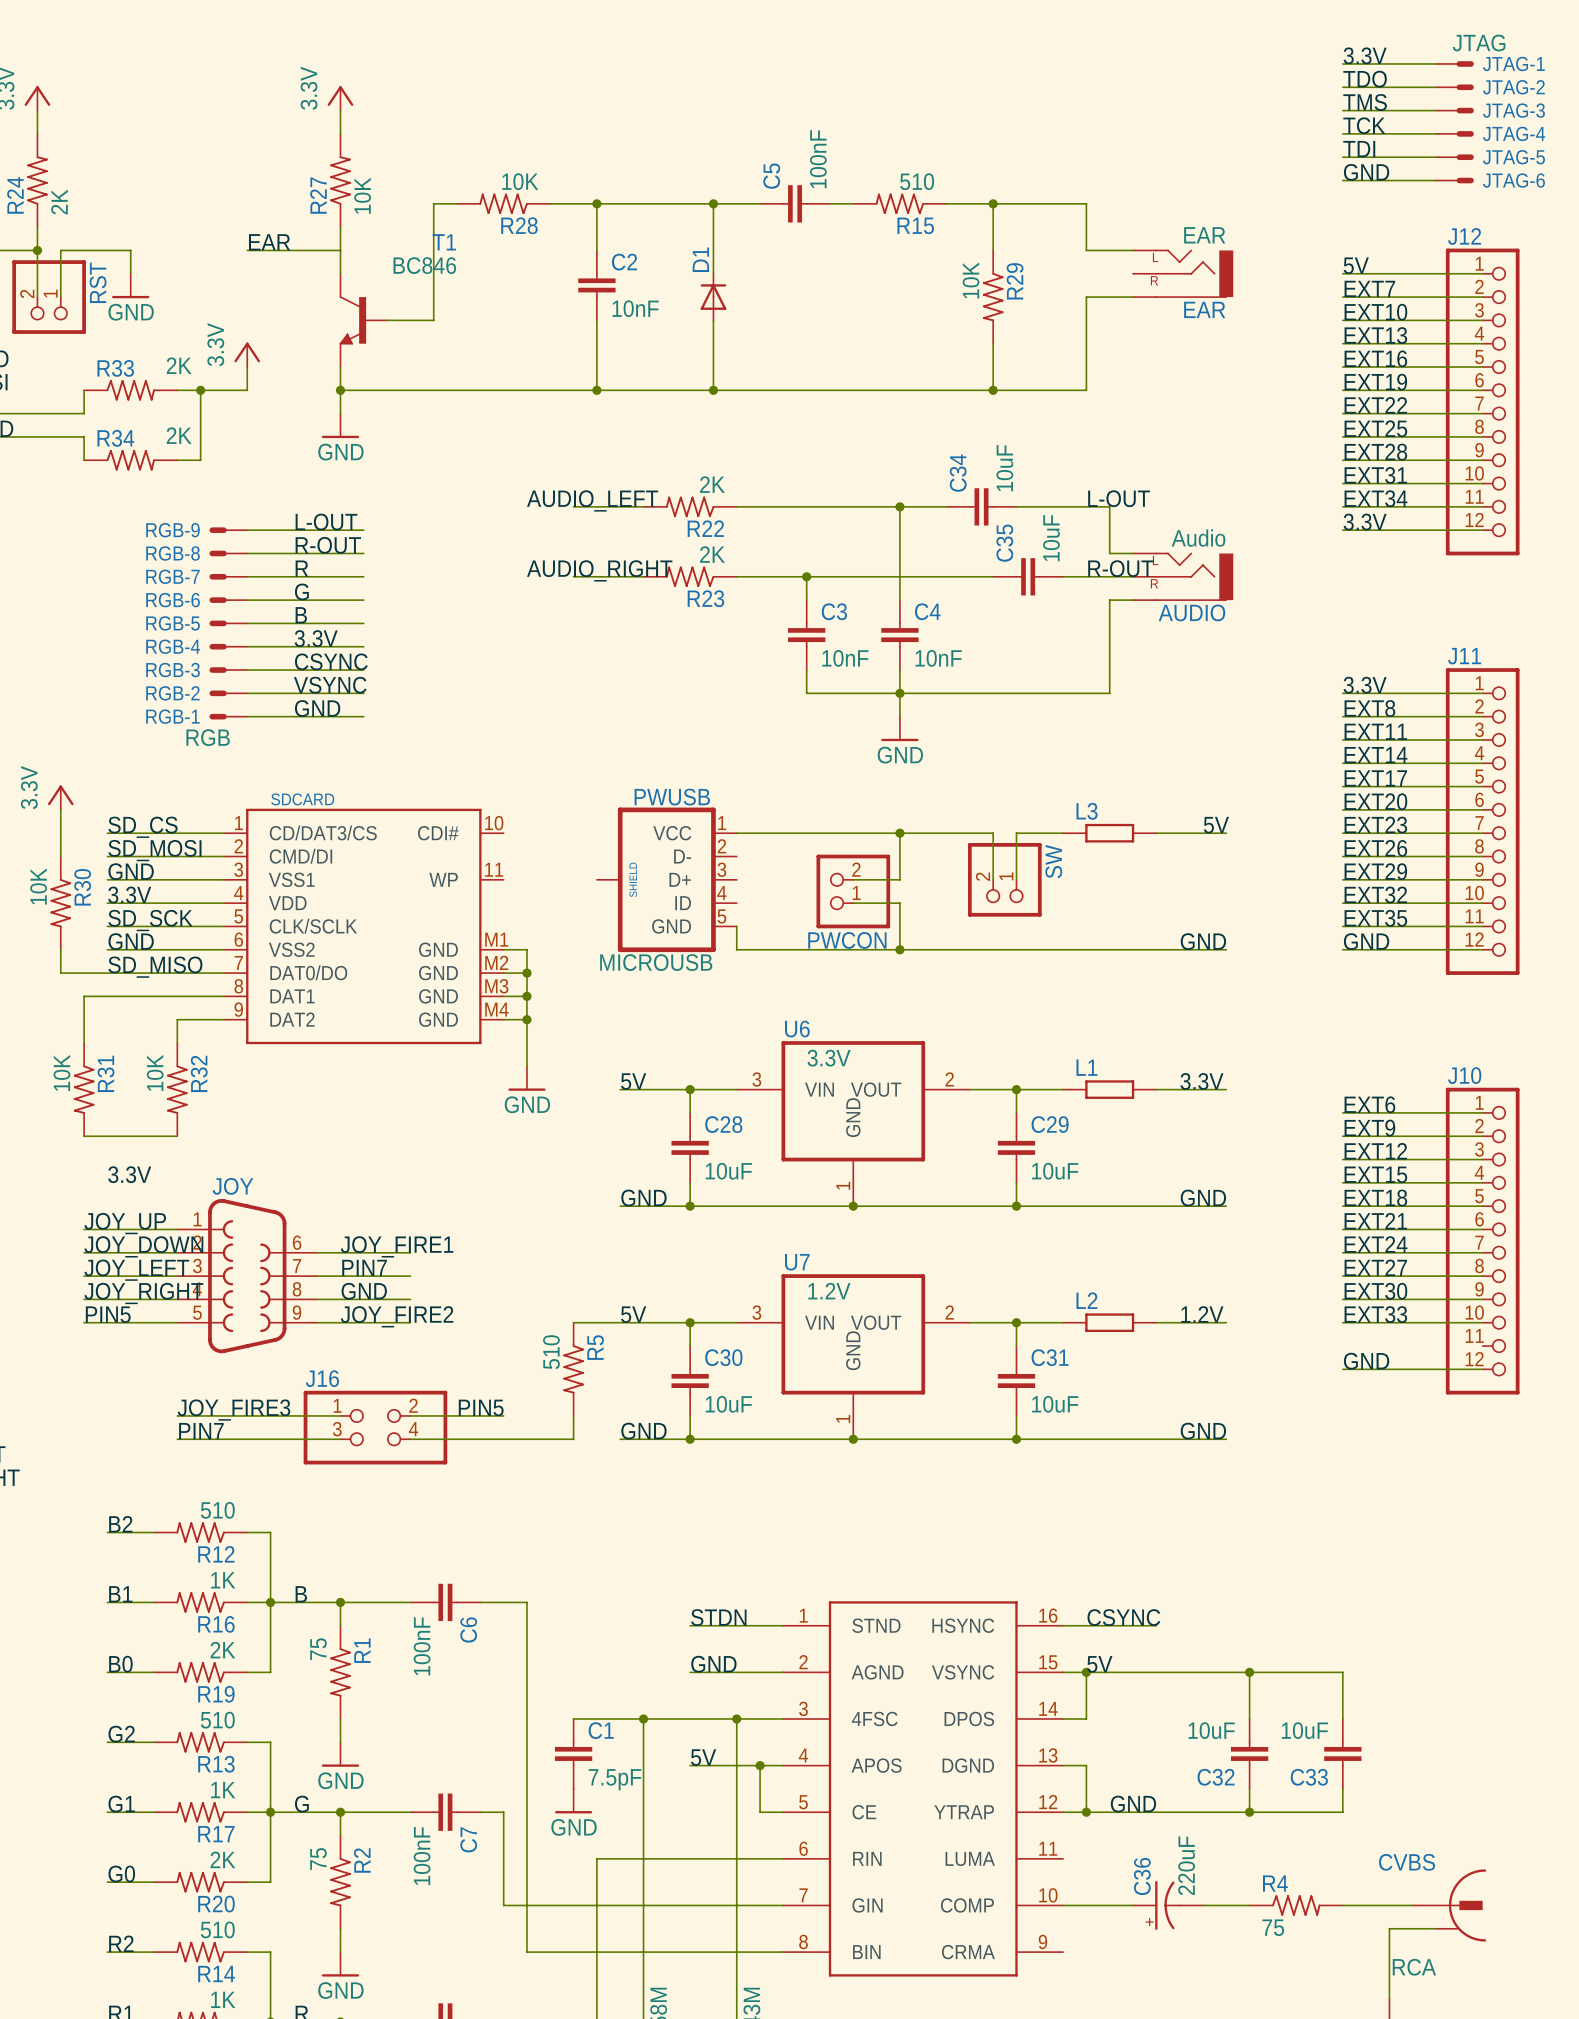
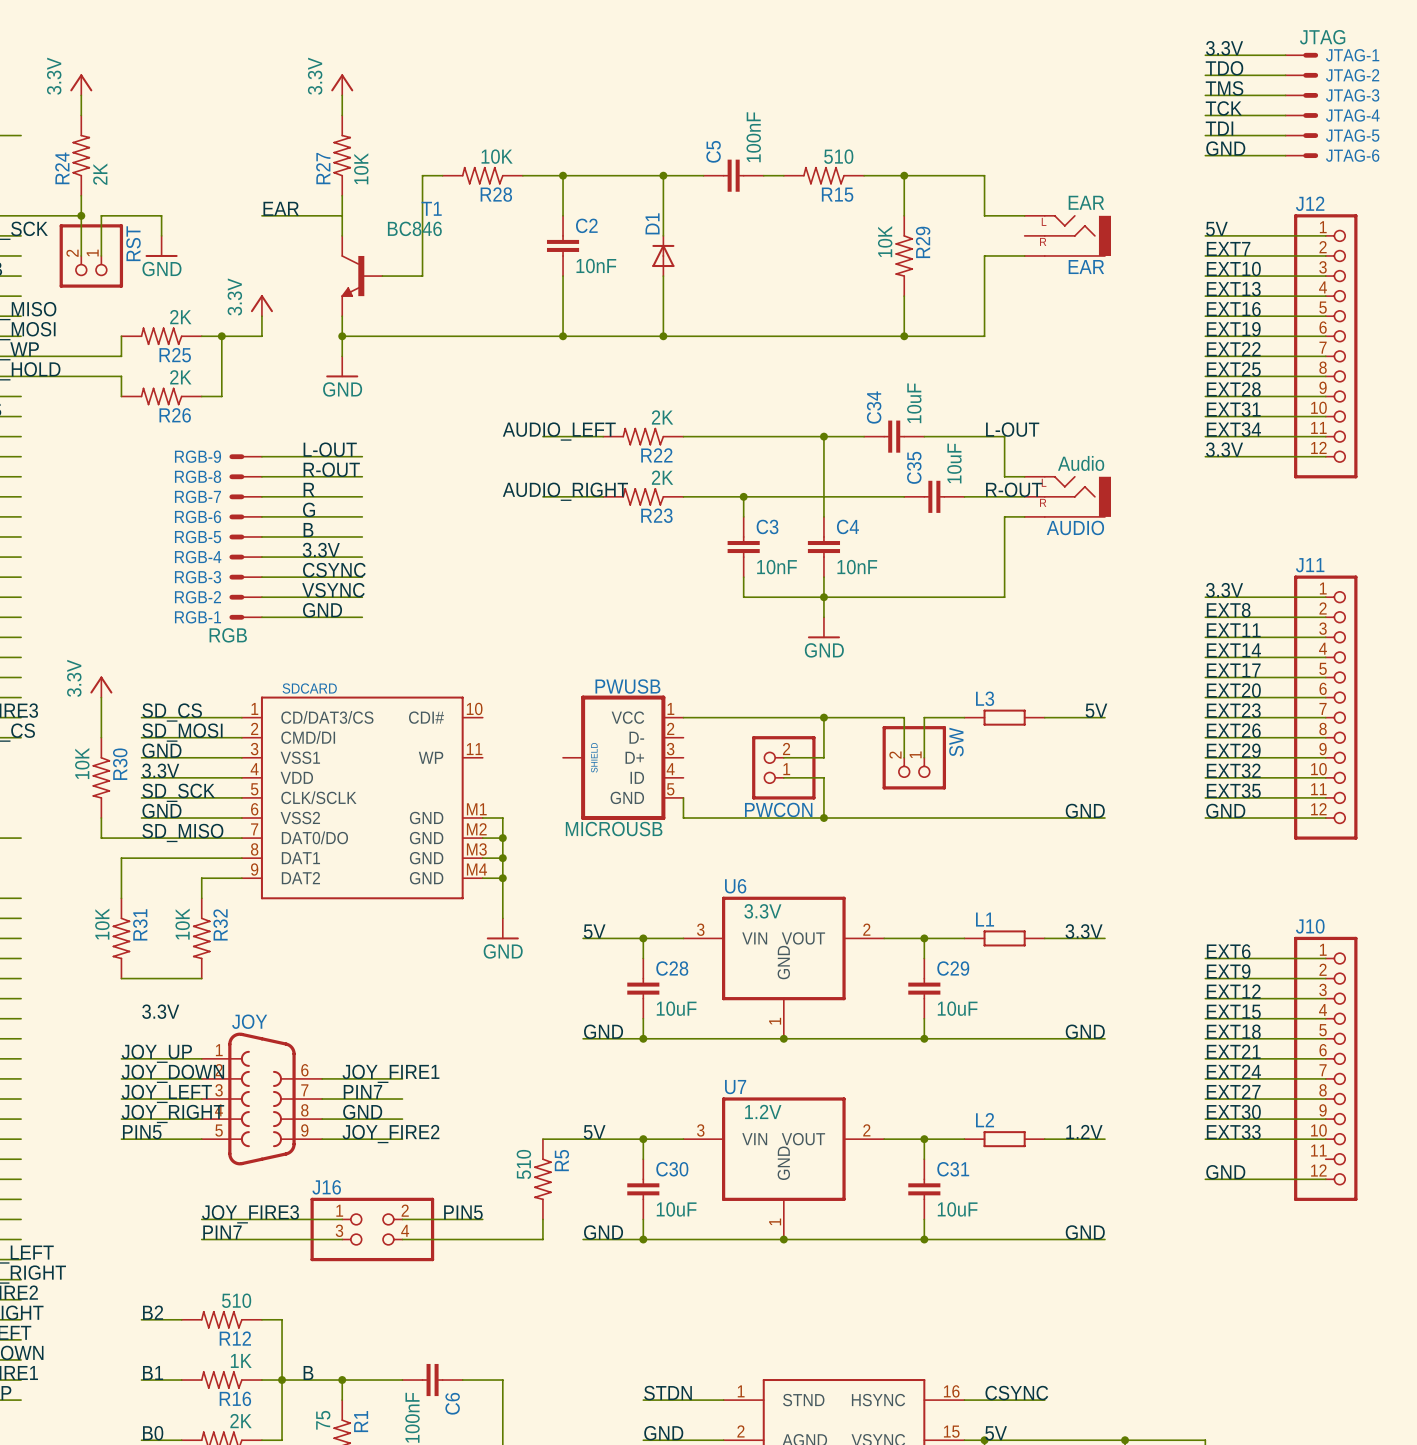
R33: 2K (130, 390) -> none
R25: none -> 2K (161, 336)
R34: 2K (130, 460) -> none
R26: none -> 2K (161, 396)

